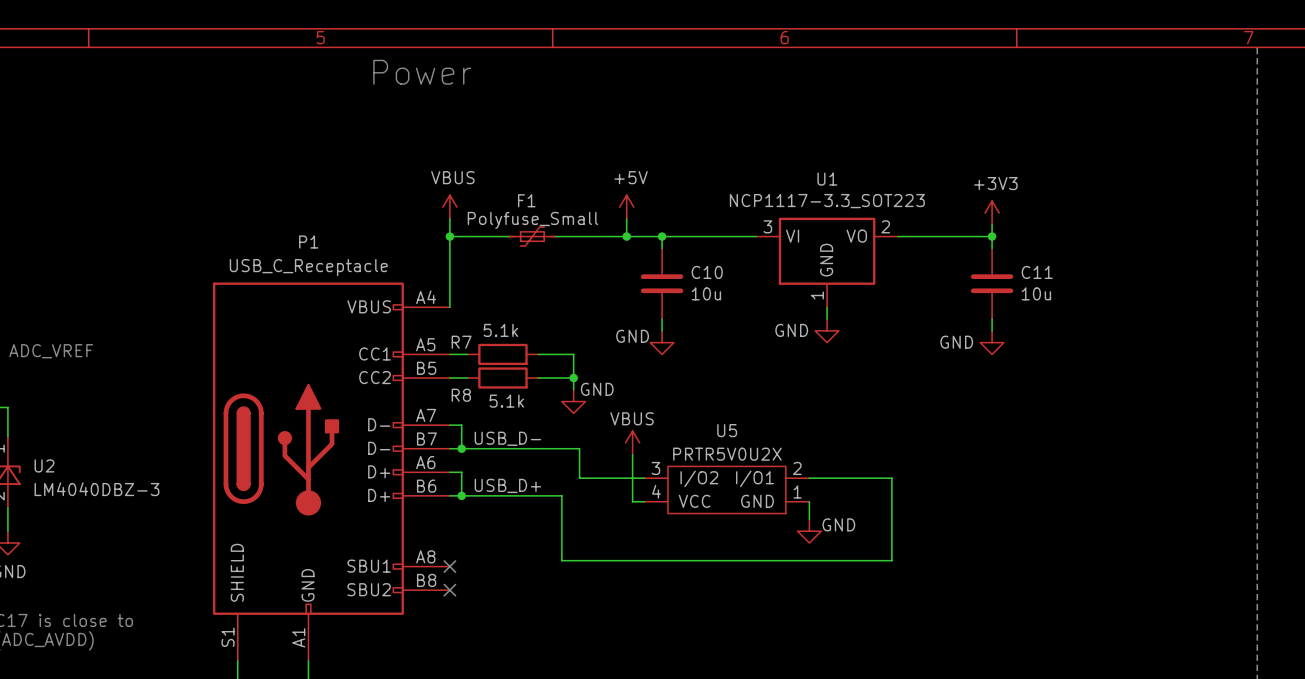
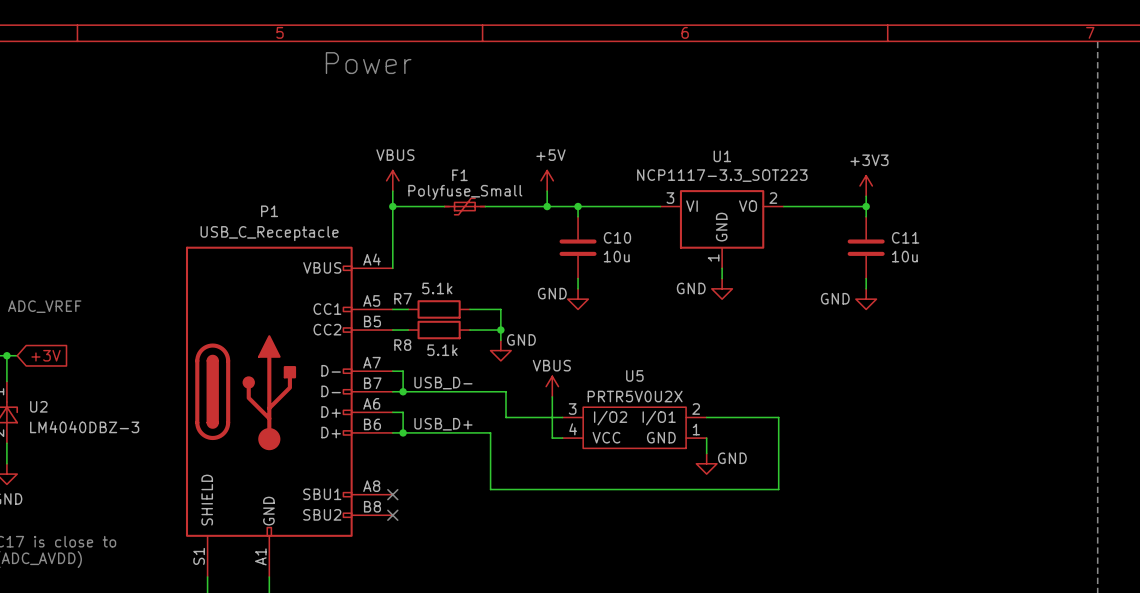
wire: none -> (6, 355) (17, 355)
junction: none -> (6, 355)
global label: none -> +3V (46, 355)

